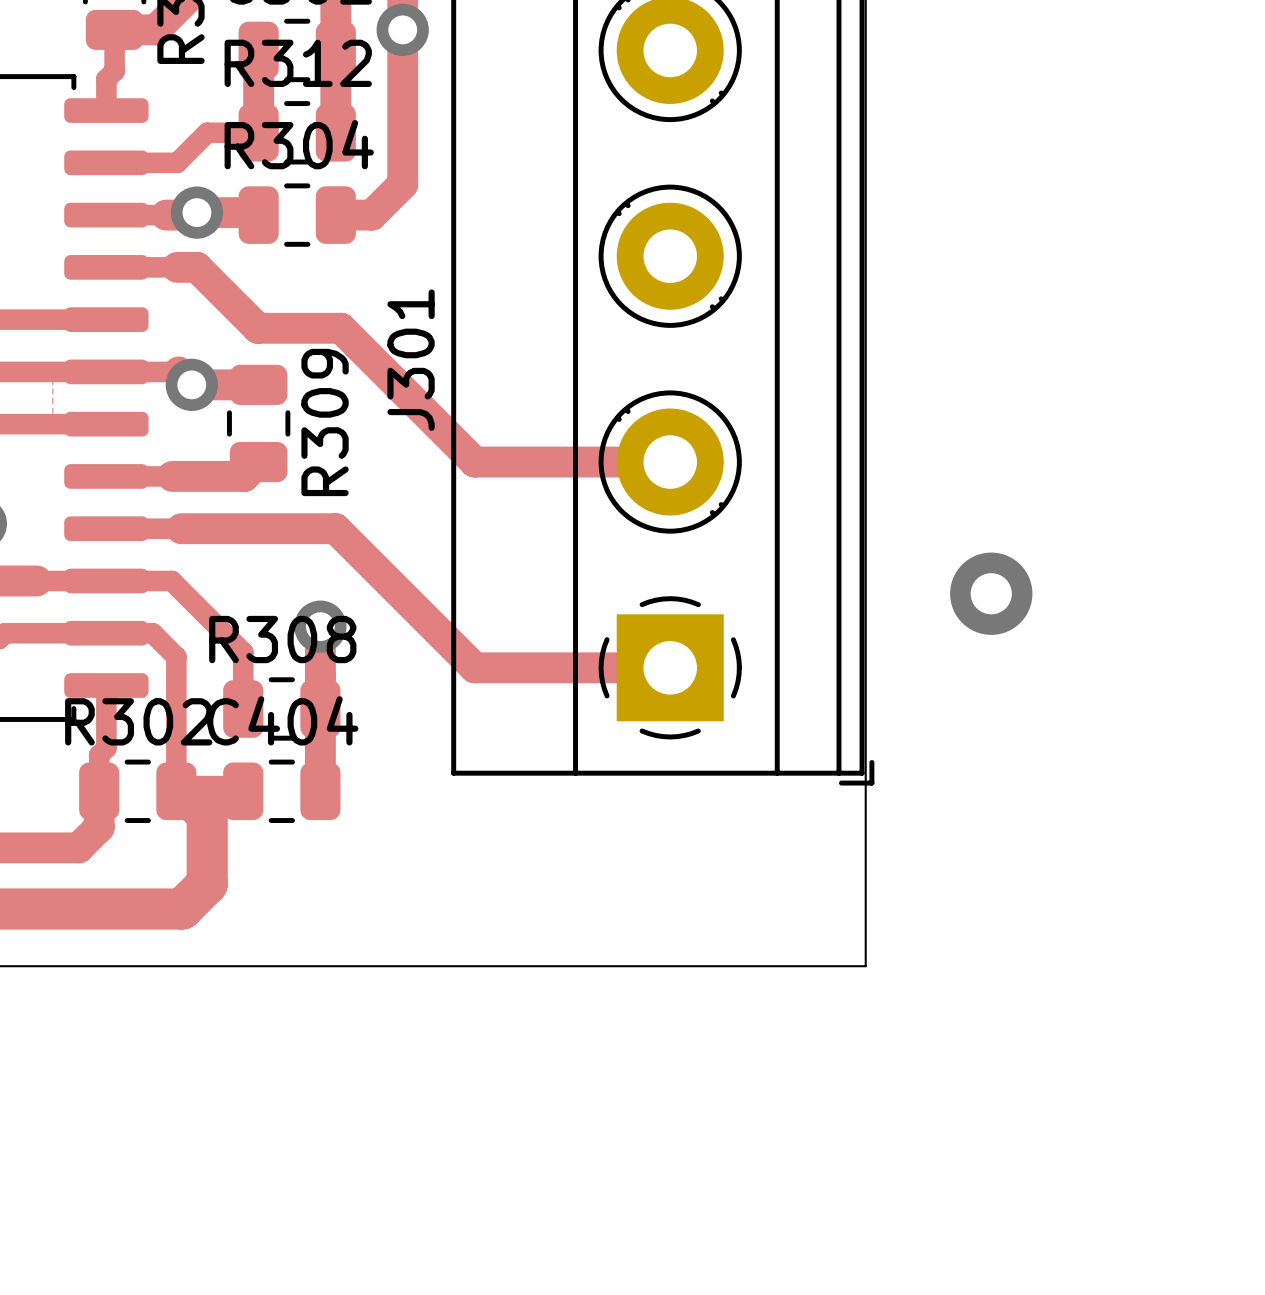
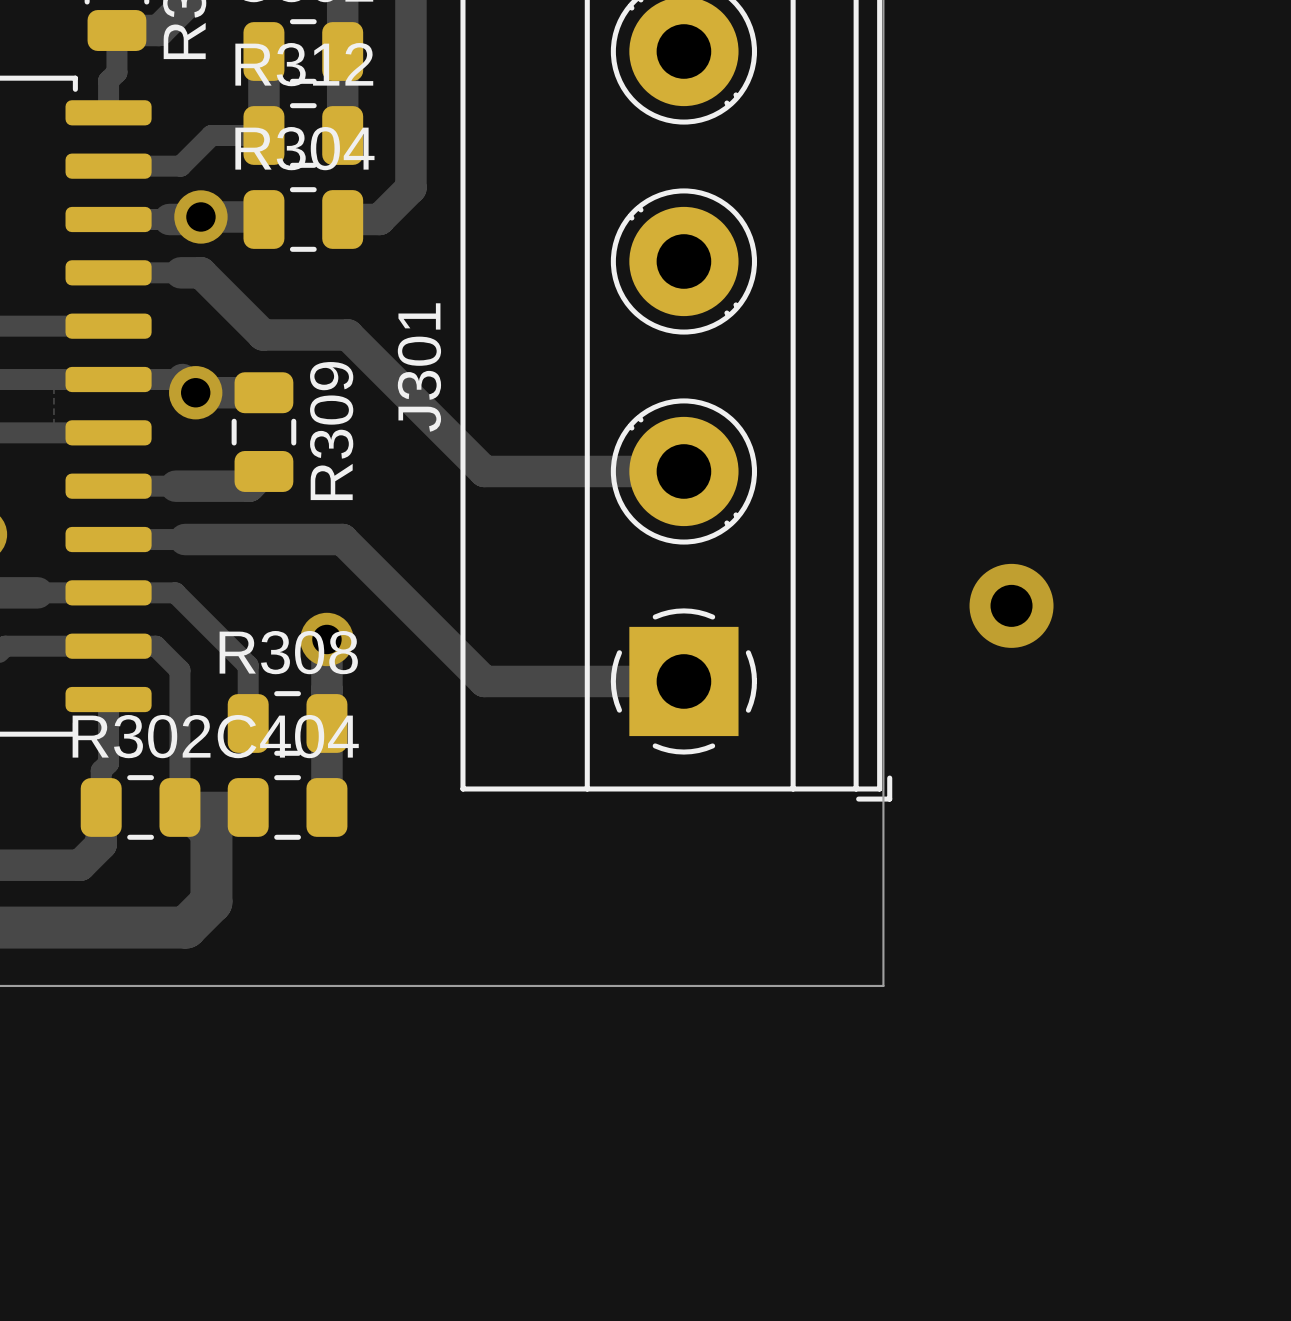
via: (402, 29) -> none

